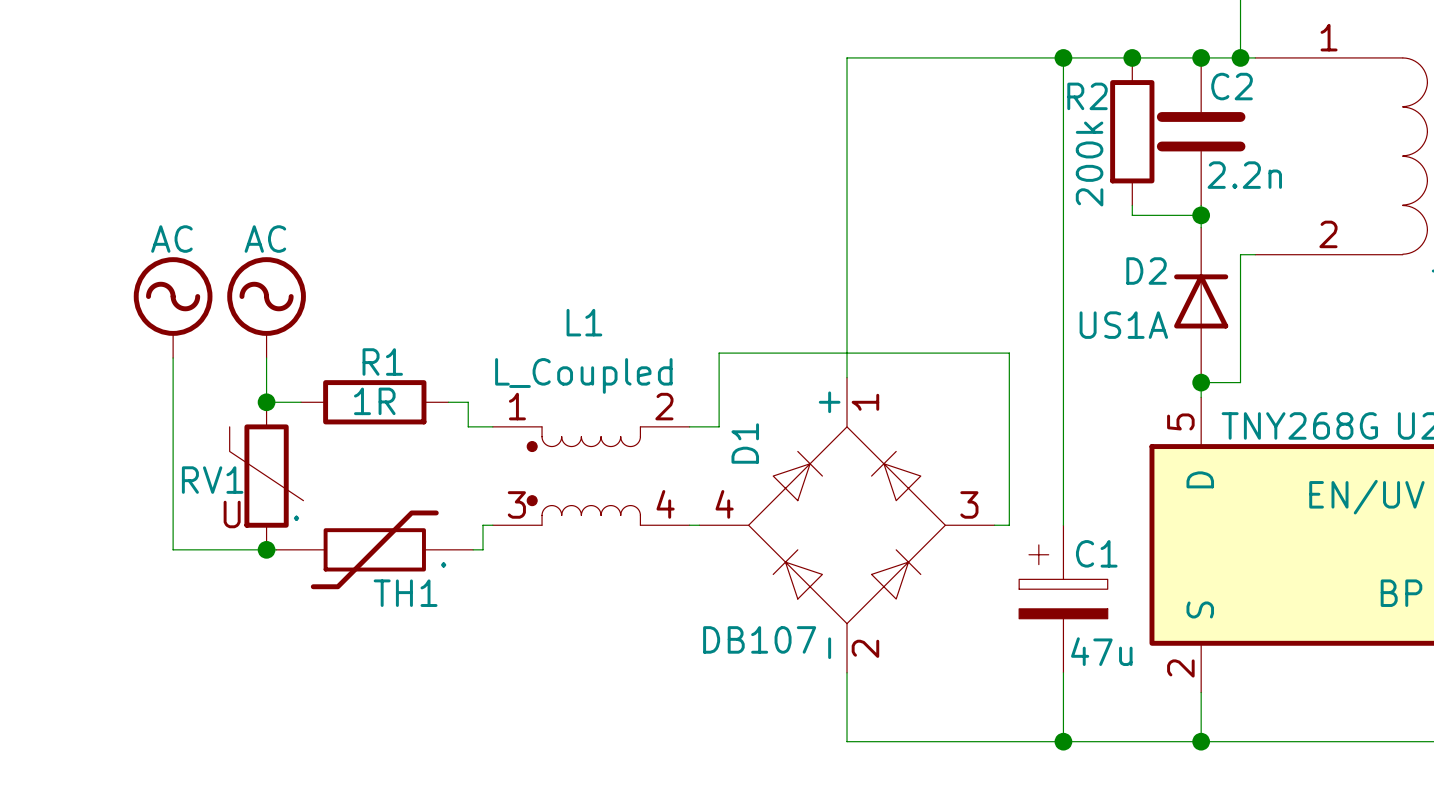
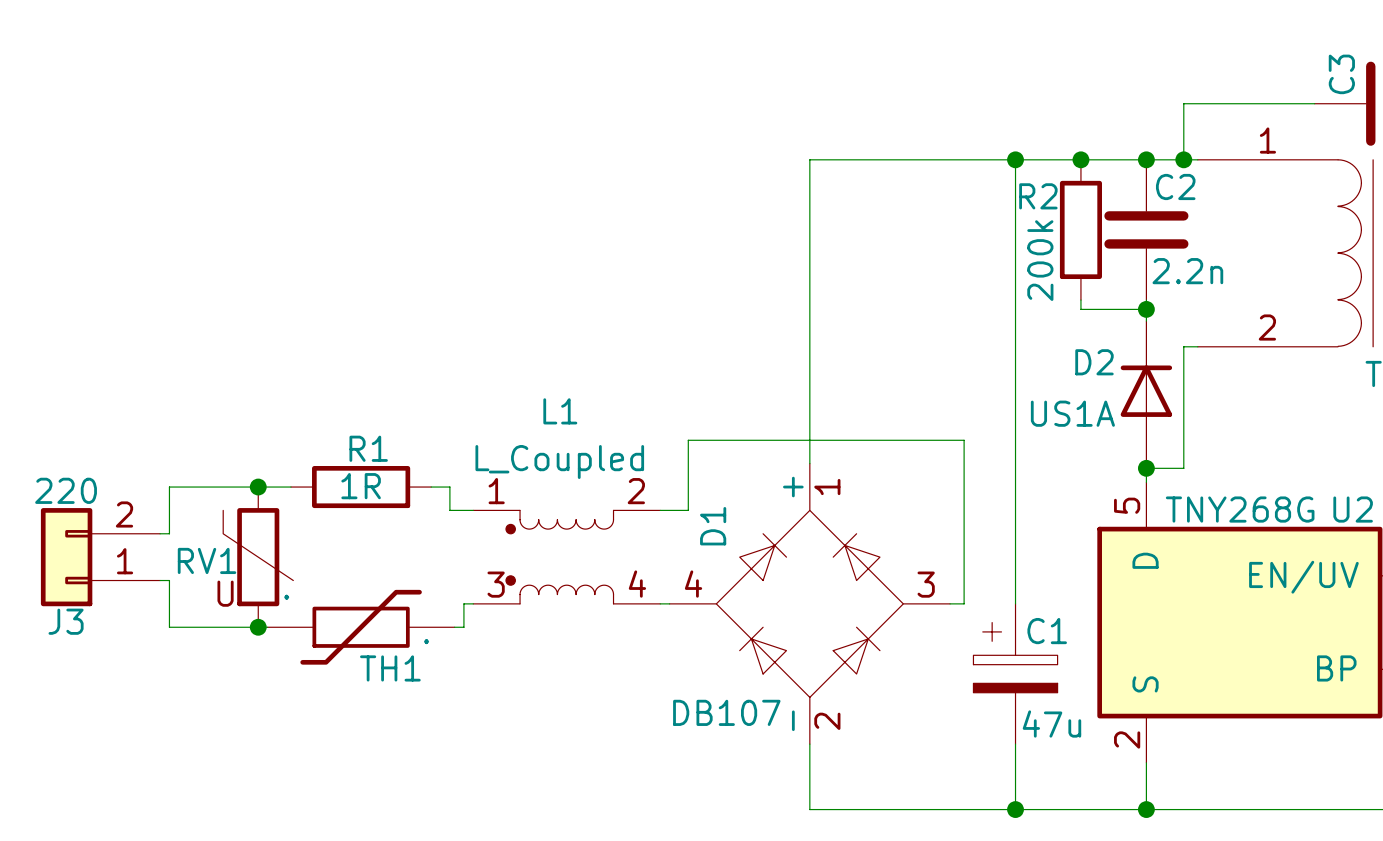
power symbol: AC (173, 307) -> none
power symbol: AC (266, 307) -> none
wire: (173, 358) (173, 402) -> (258, 487) (169, 487)
wire: (266, 358) (266, 402) -> none
wire: (173, 451) (173, 500) -> (169, 533) (160, 533)
J3: none -> 220 (100, 557)
wire: none -> (160, 580) (169, 580)

